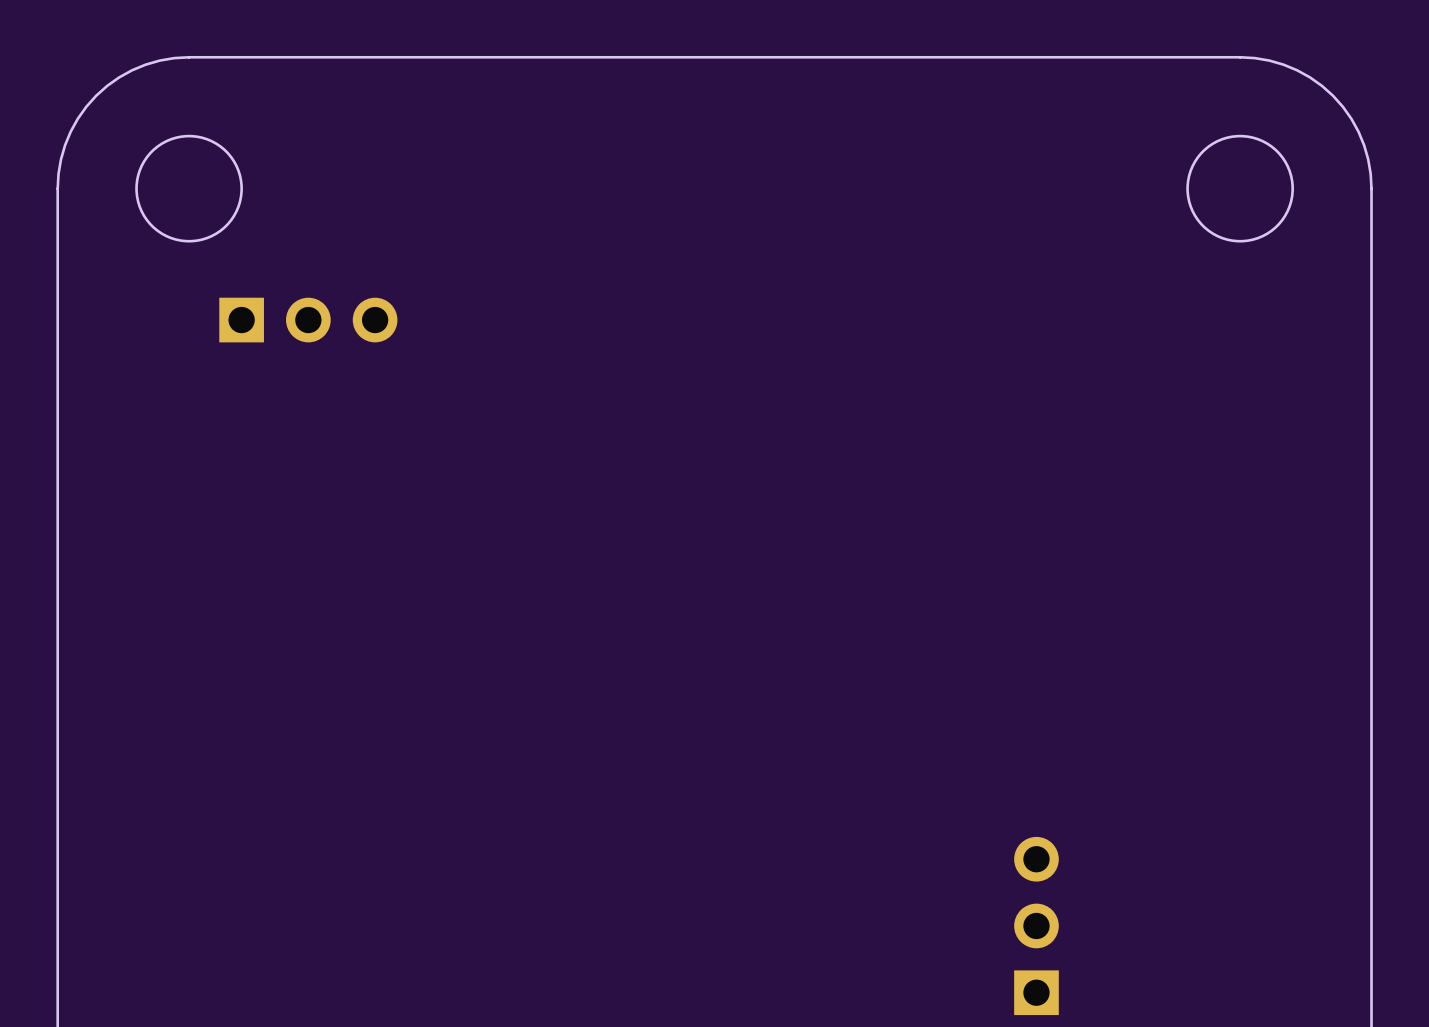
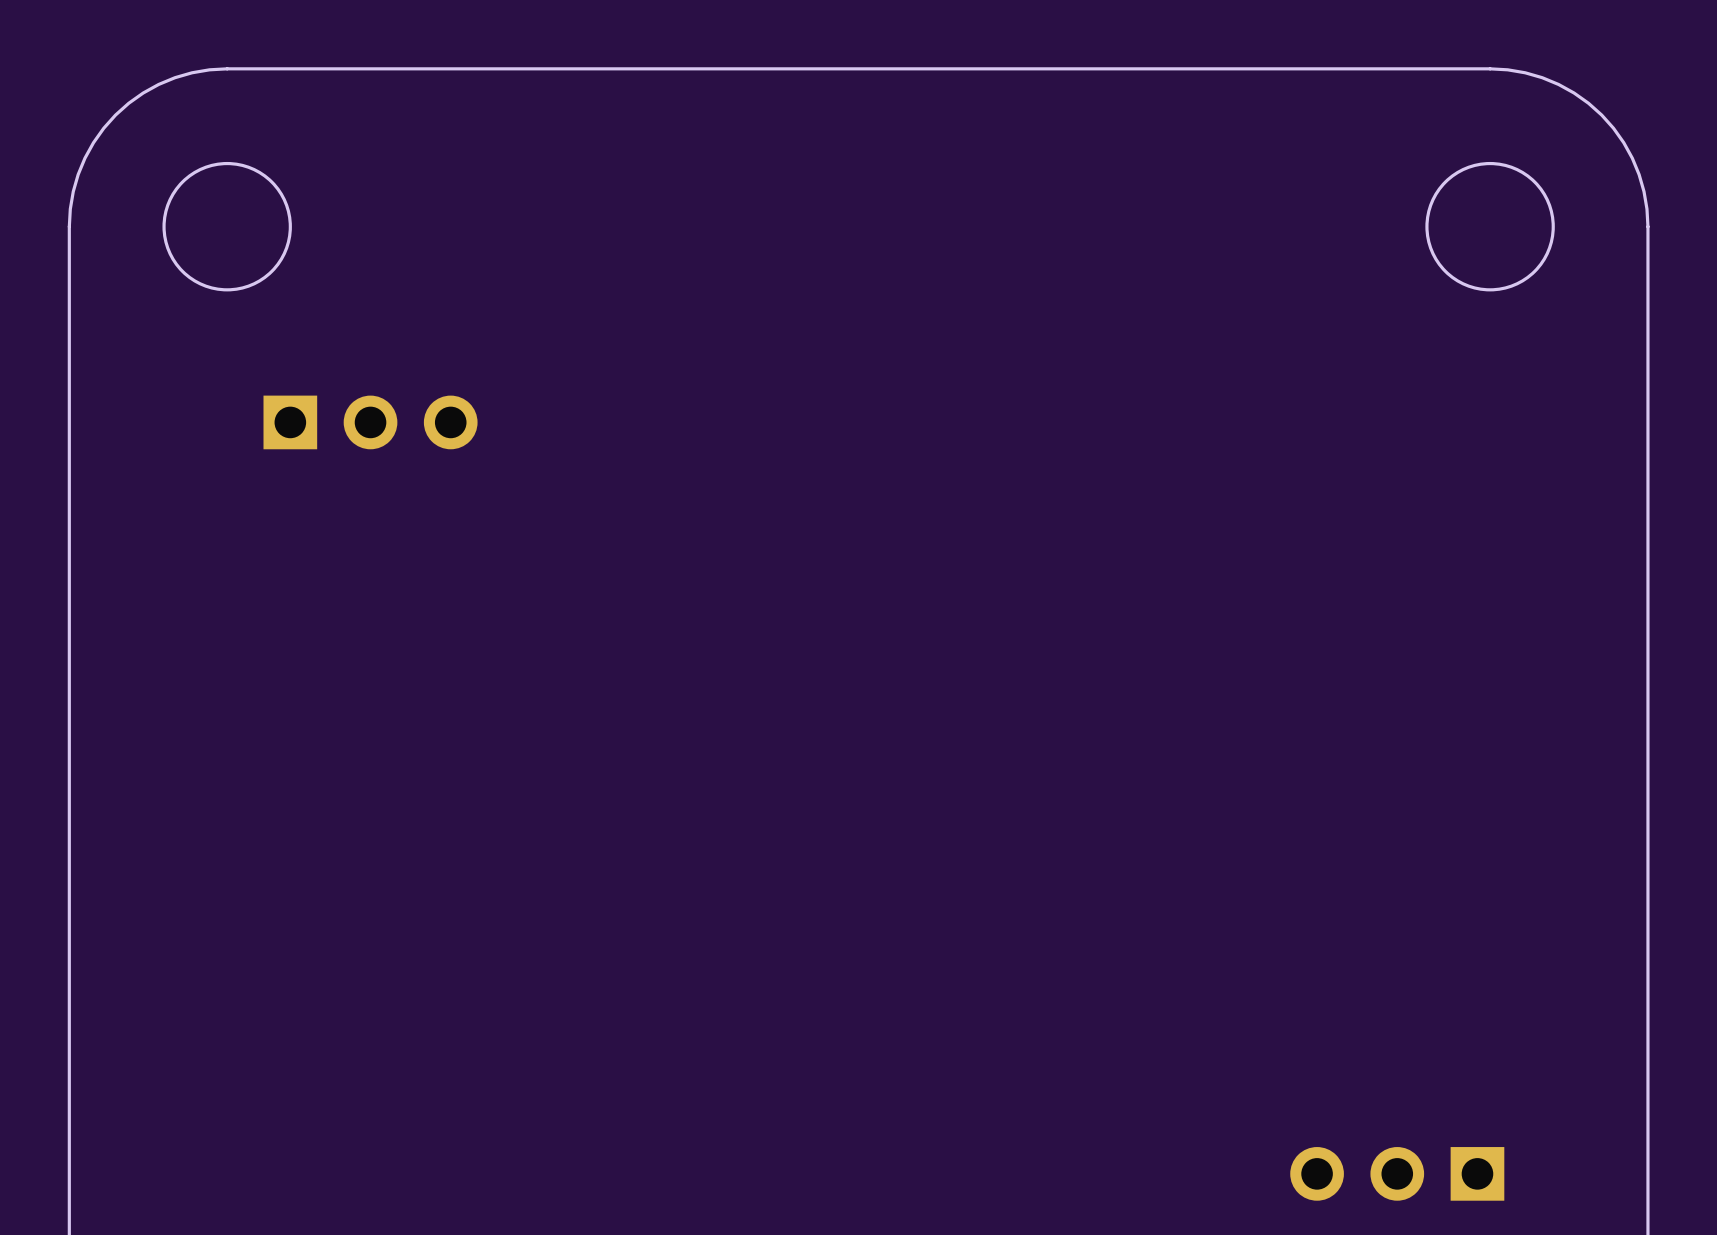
part position: (308, 320) -> (370, 422)
part rotation: 0° (1036, 925) -> 90° counterclockwise (1397, 1173)
part position: (1036, 925) -> (1397, 1173)

